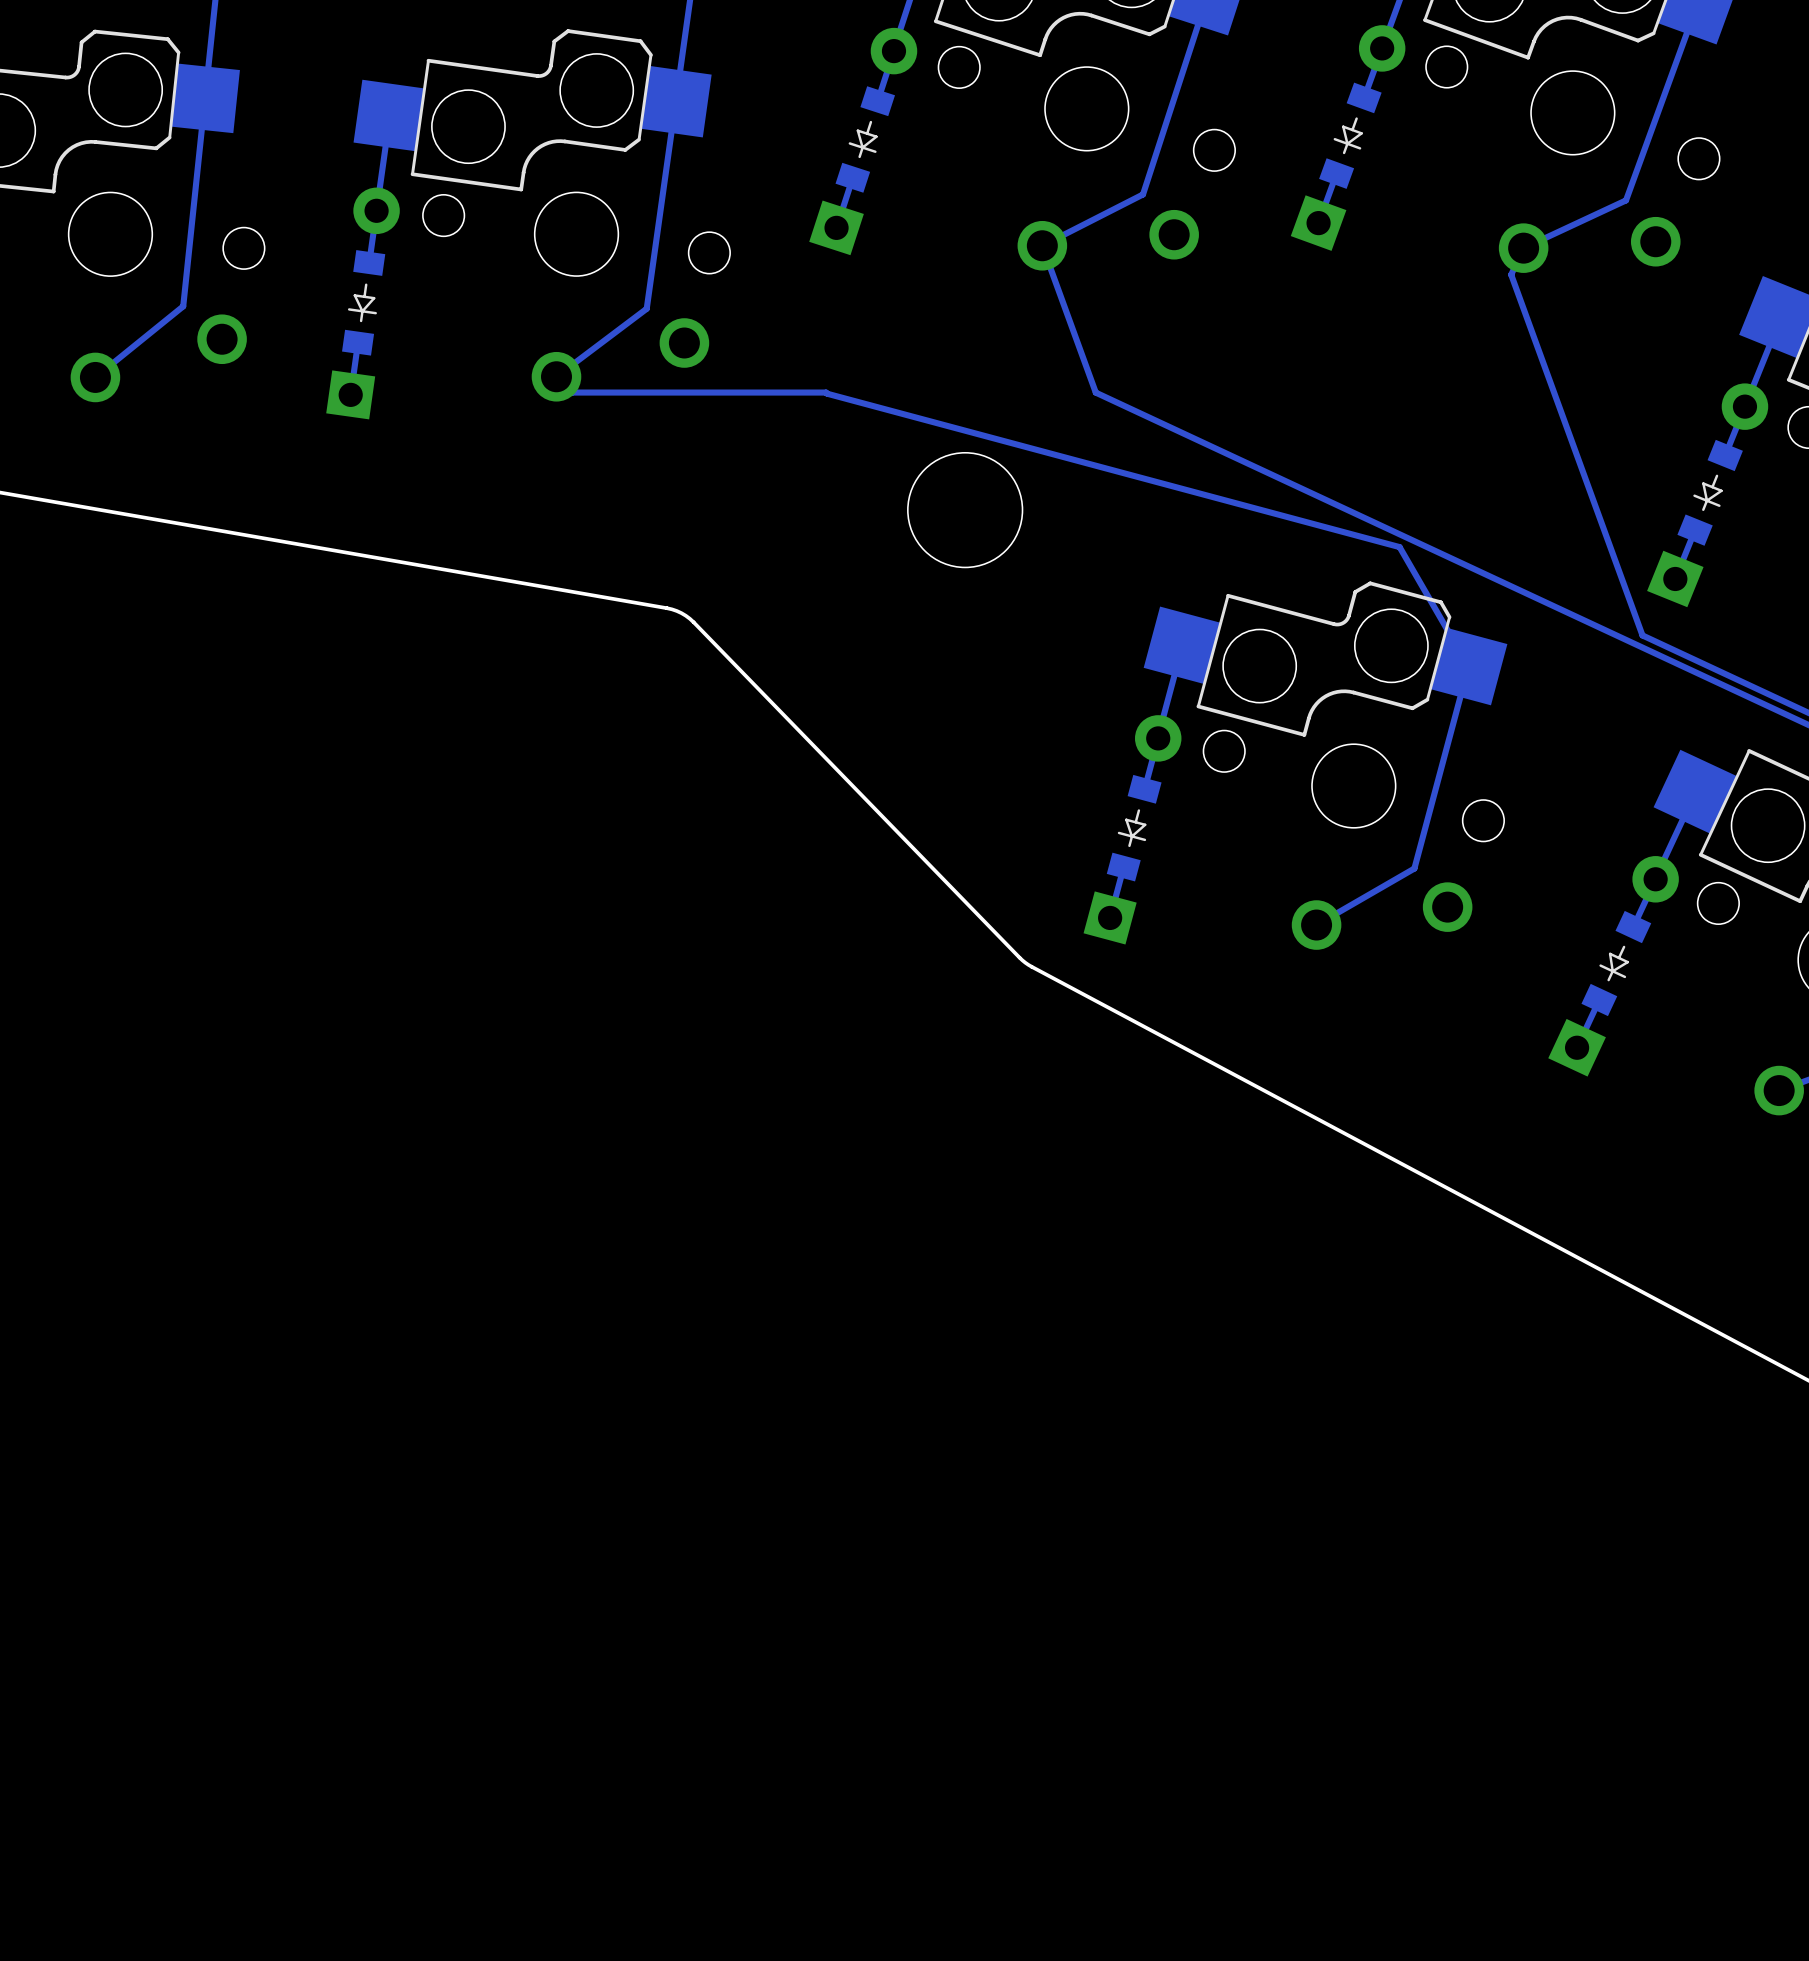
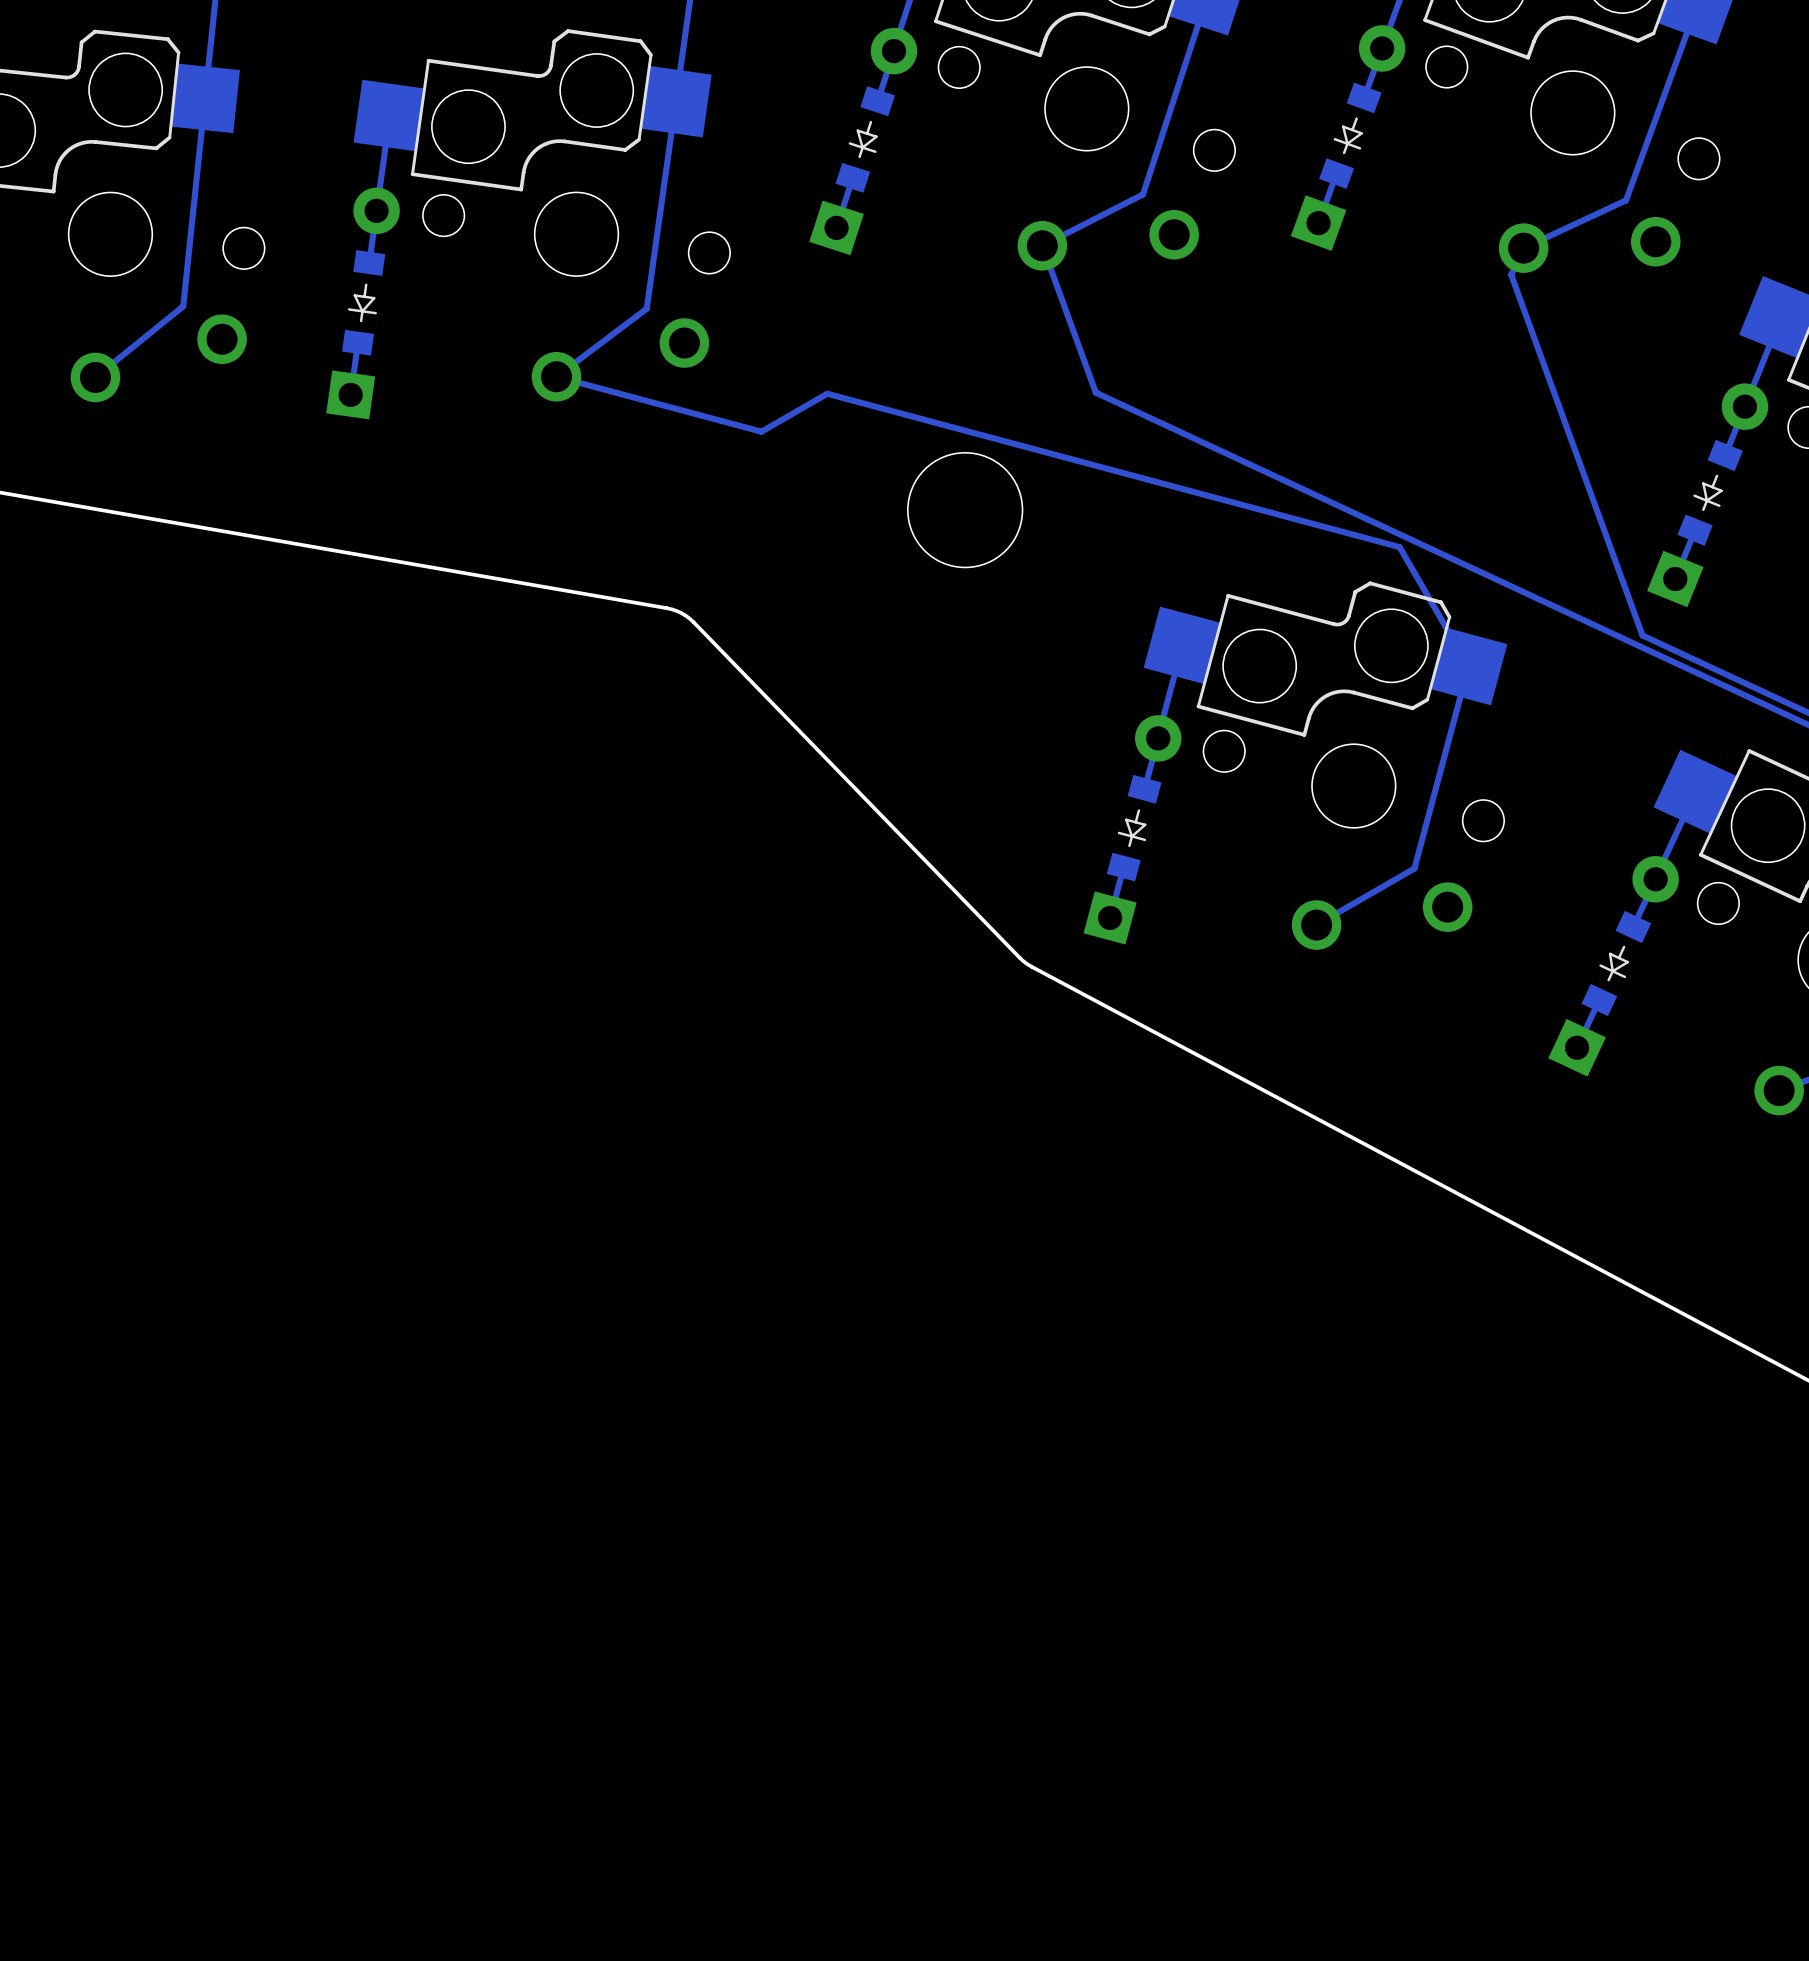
track: (646, 308) (556, 376) (572, 392) (827, 393) -> (646, 308) (556, 376) (761, 431) (827, 393)

